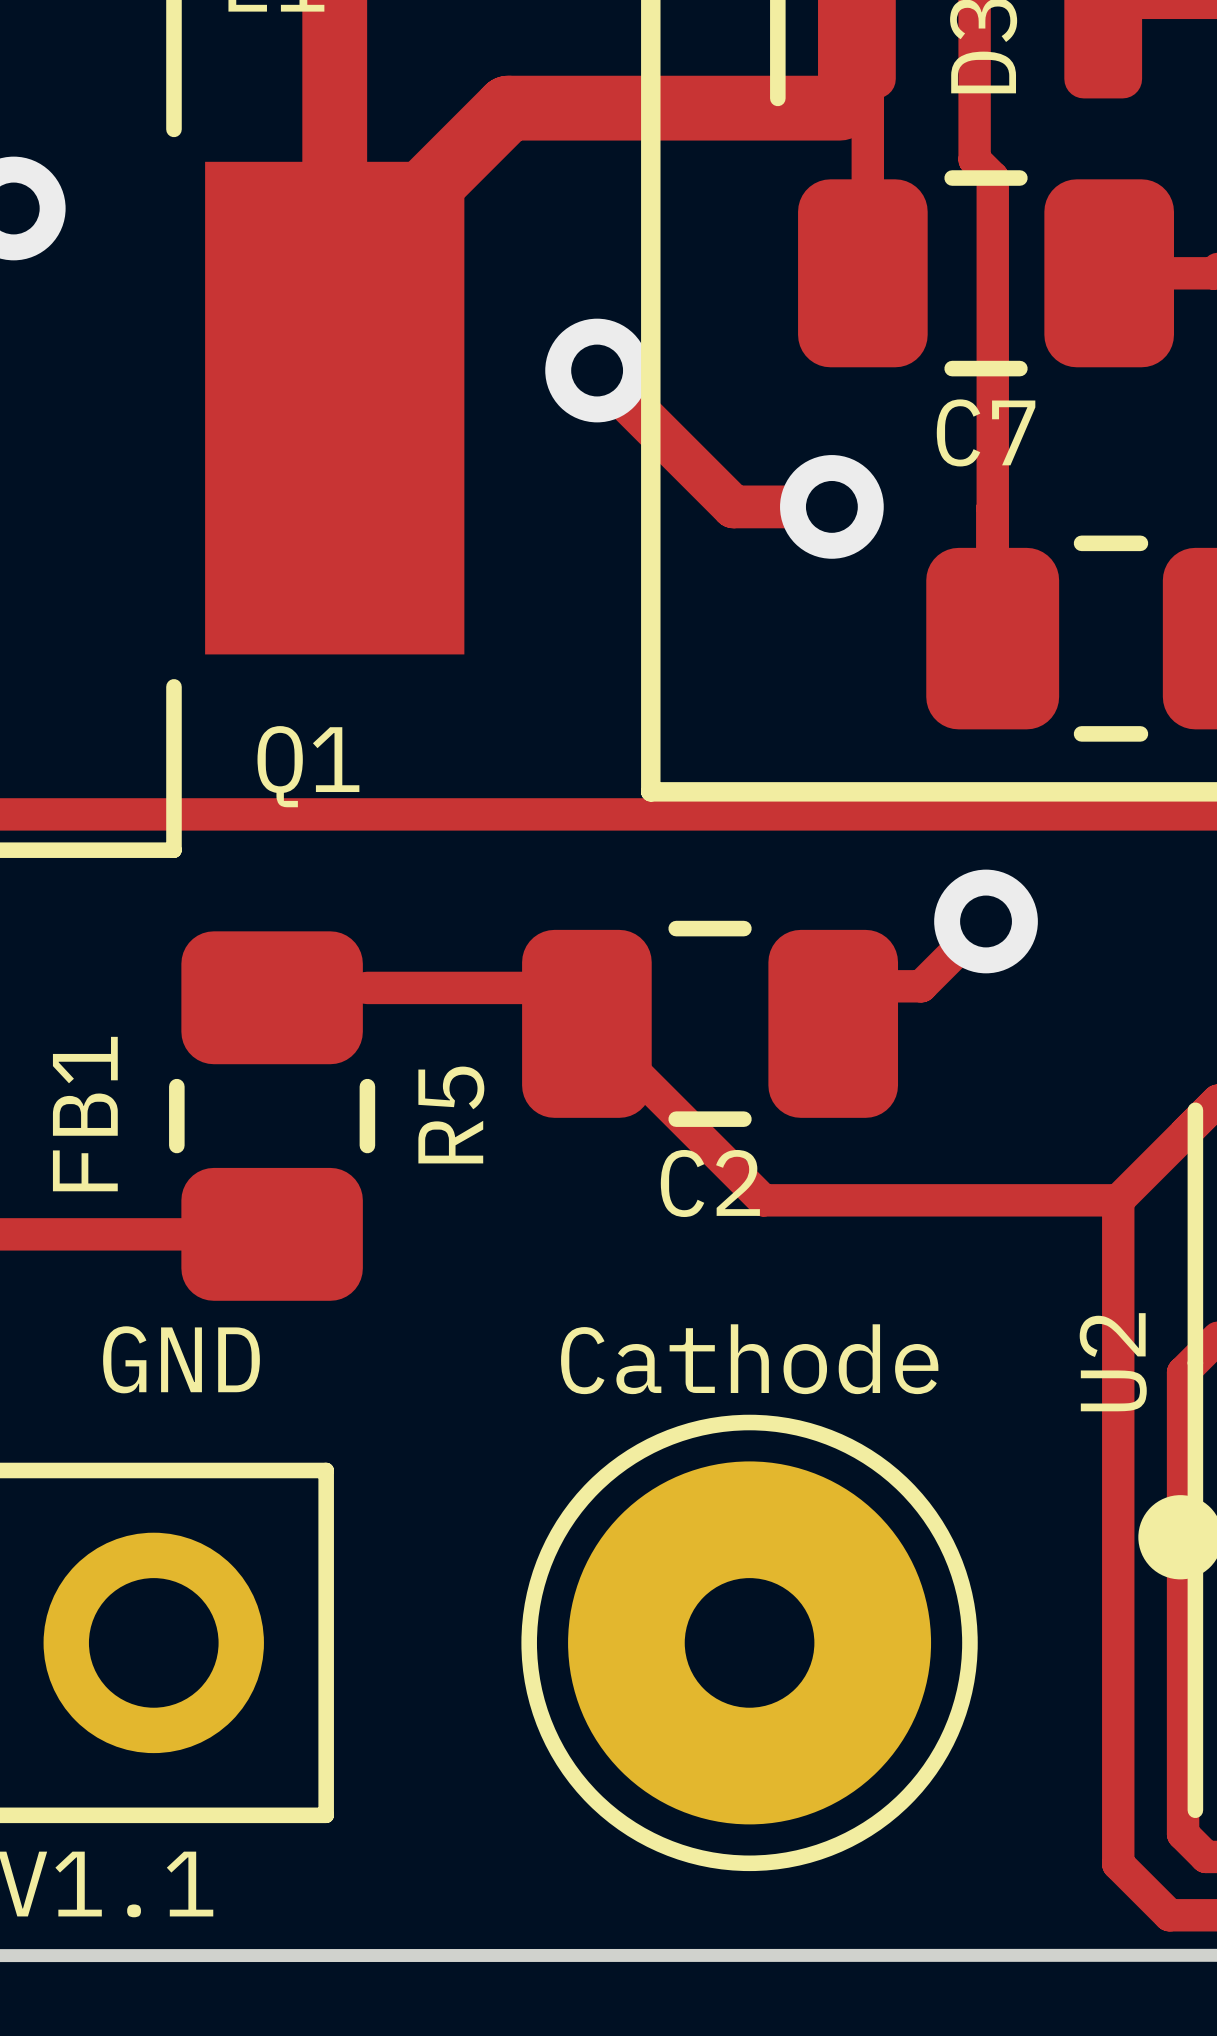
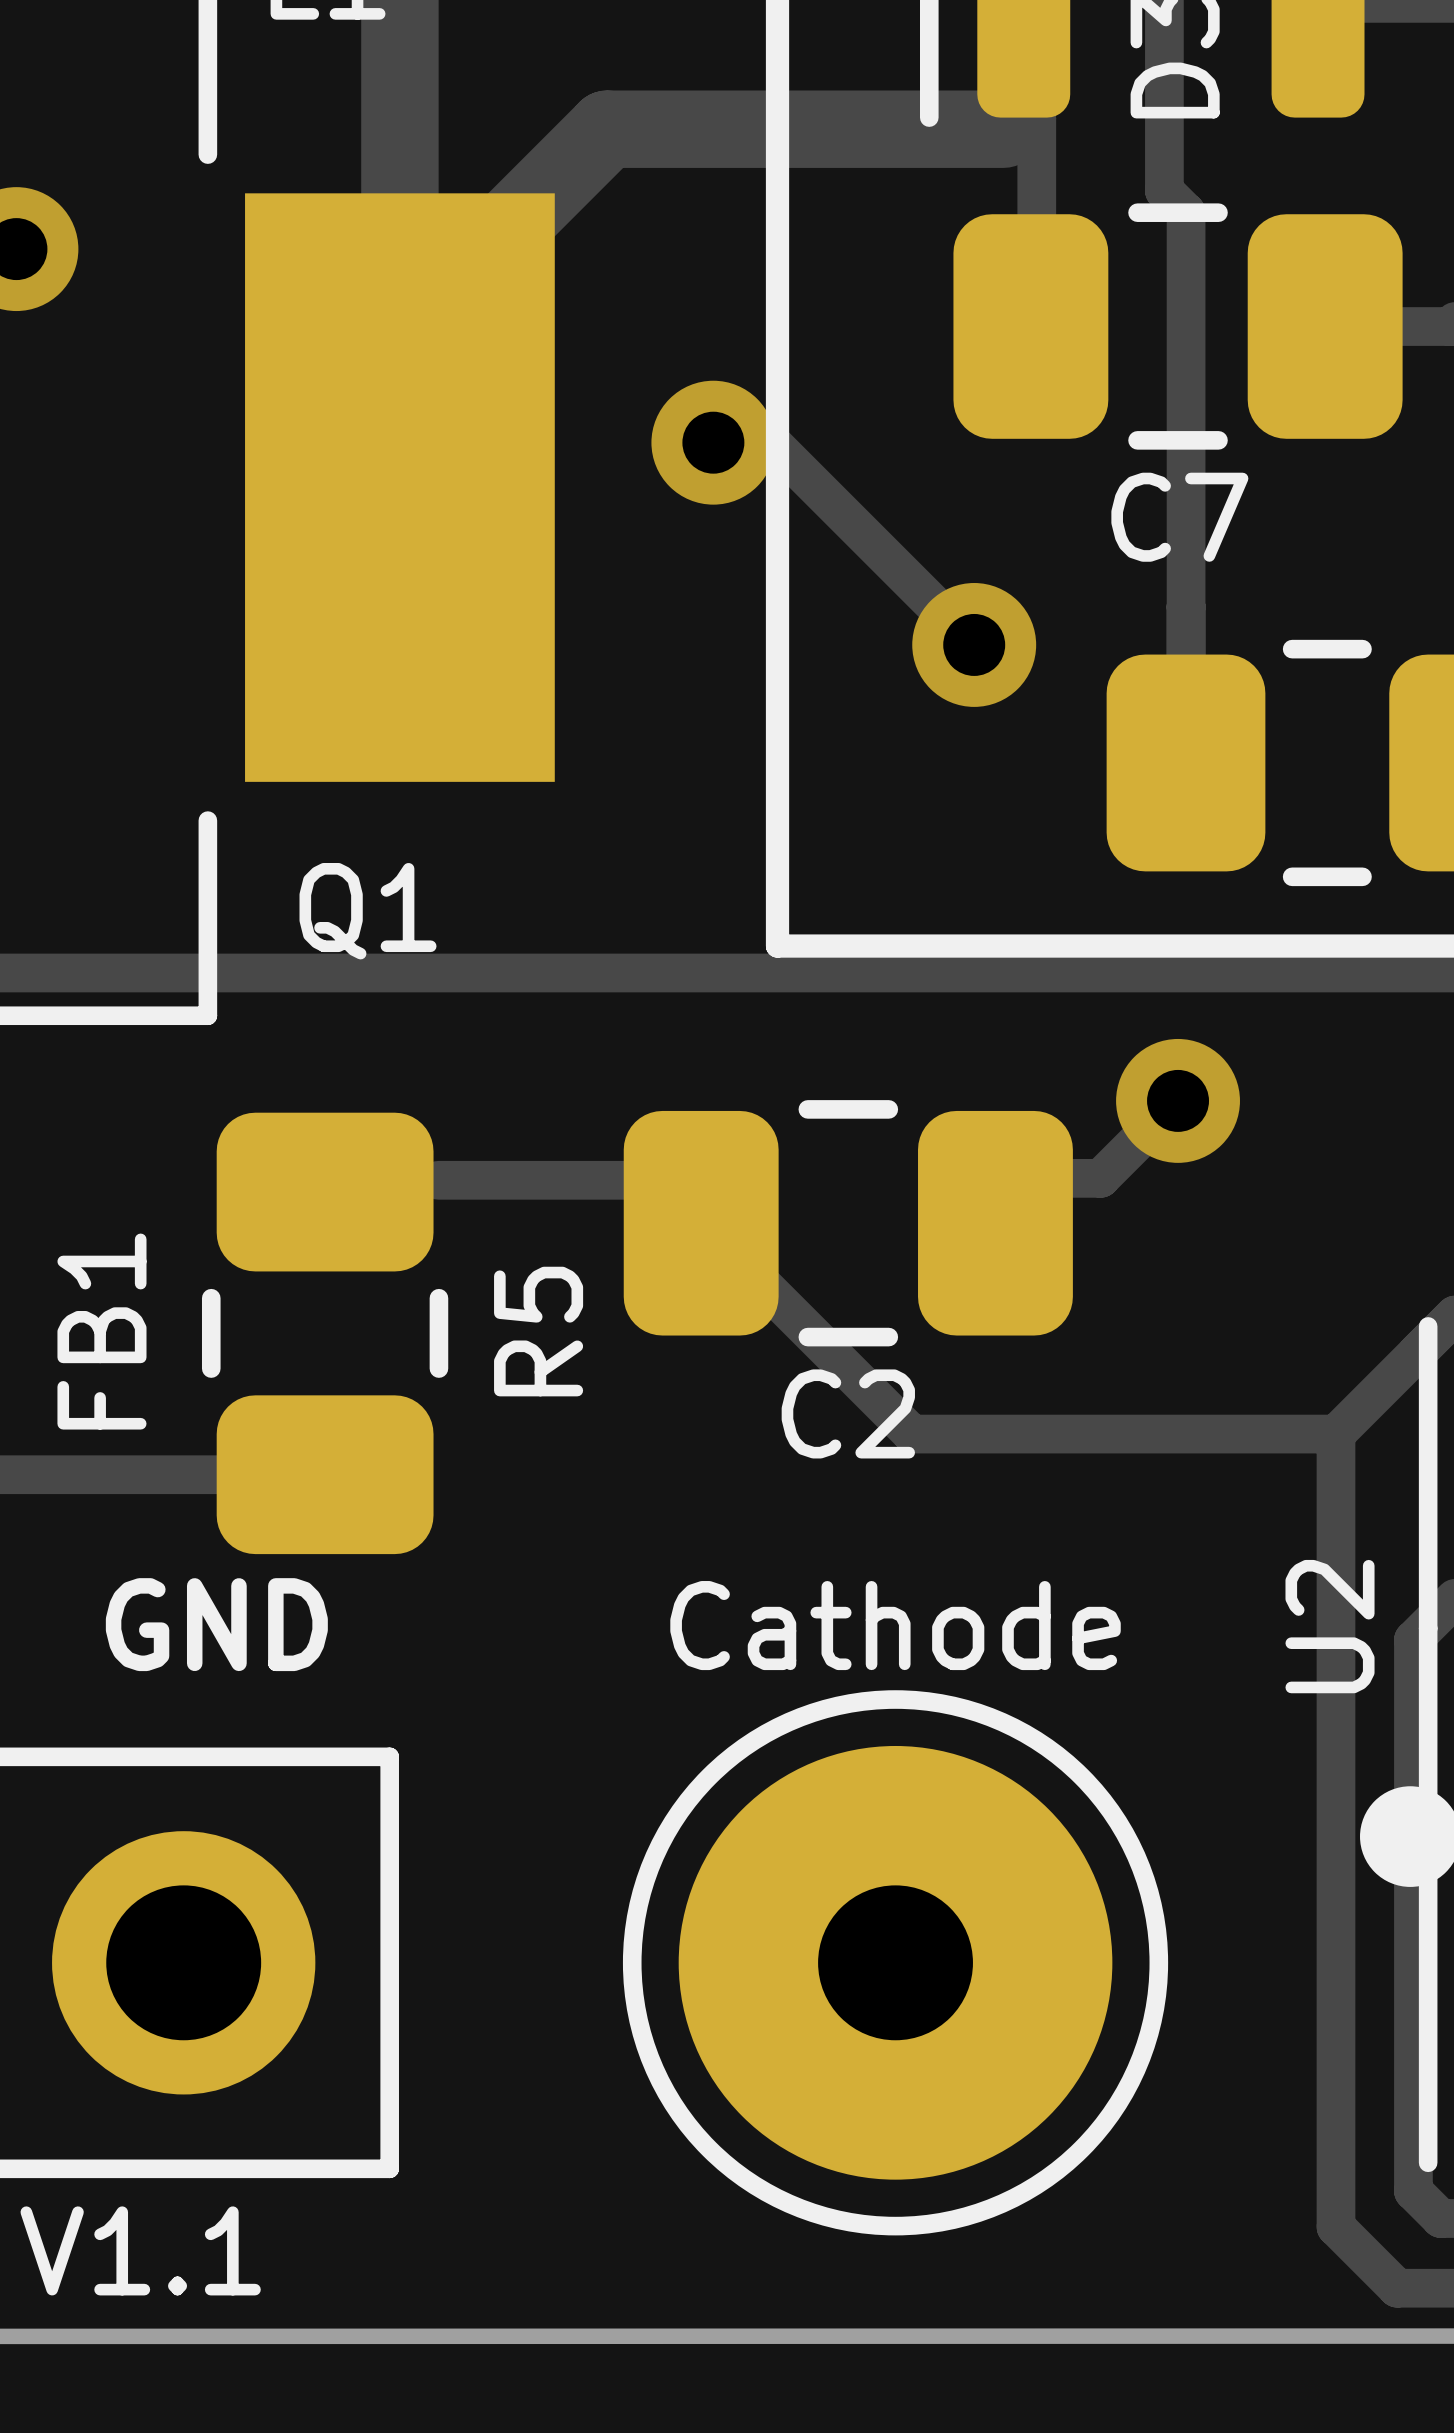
track: (597, 370) (733, 506) (831, 506) -> (713, 442) (771, 442) (974, 644)
via position: (831, 506) -> (974, 644)

